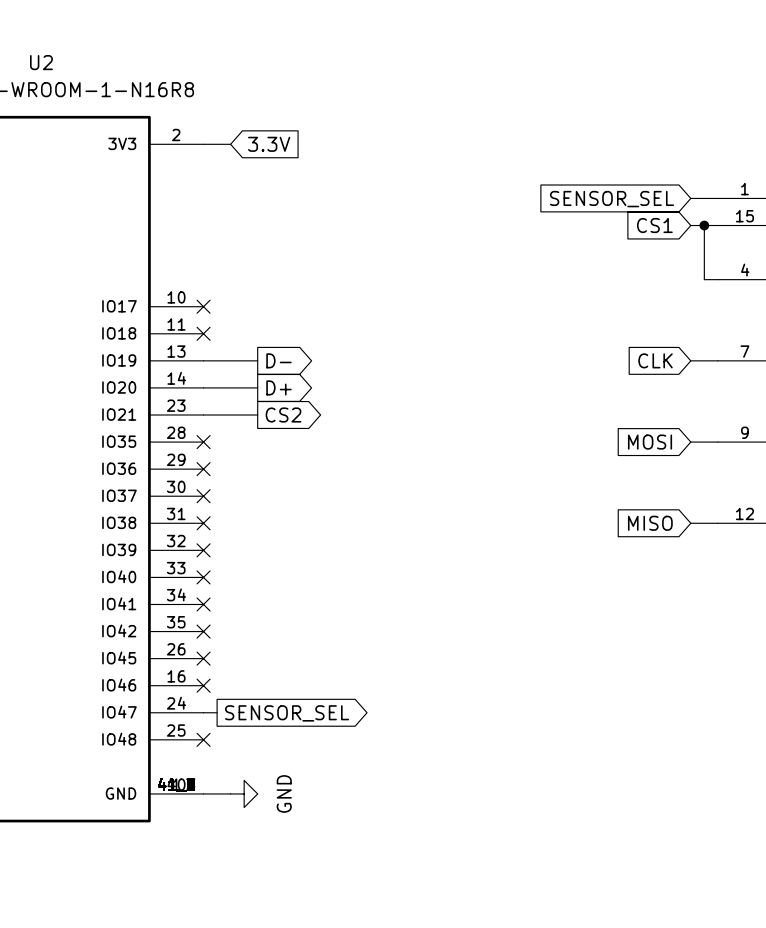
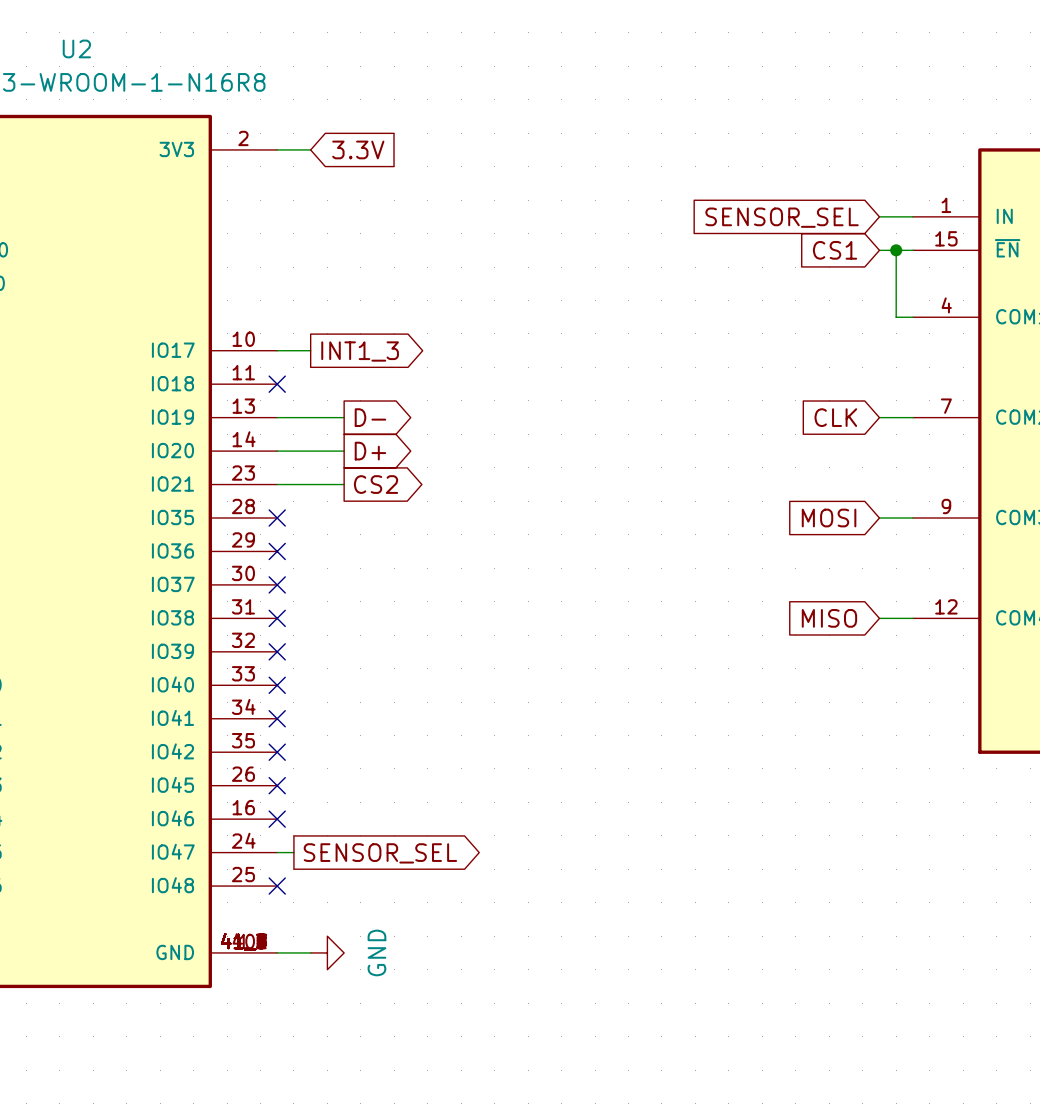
wire: none -> (277, 350) (310, 350)
no-connect mark: (203, 306) -> none
global label: none -> INT1_3 (360, 351)

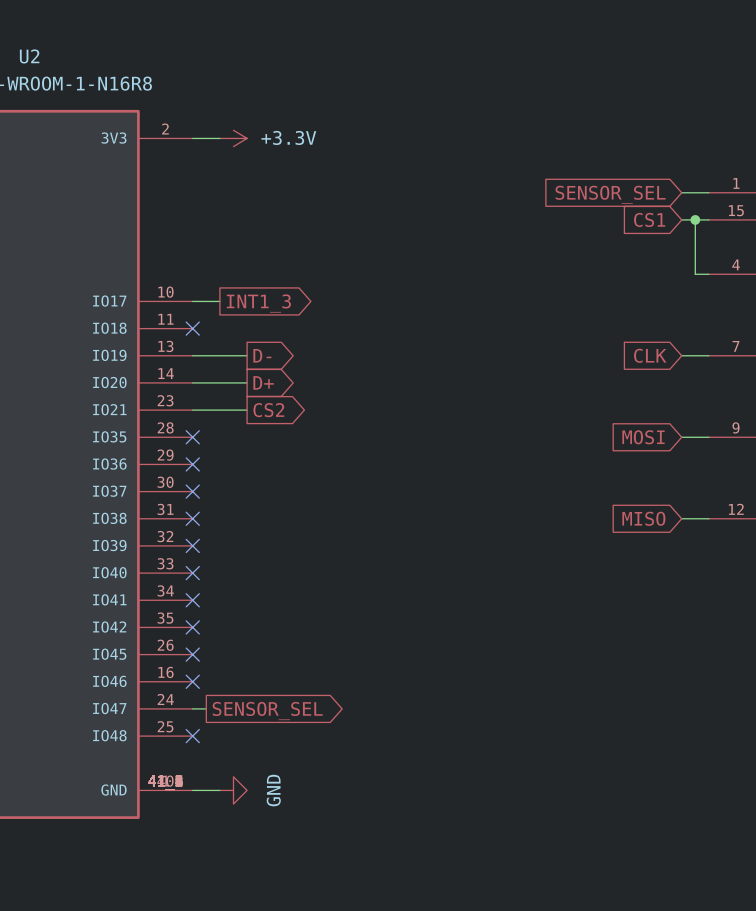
power symbol: none -> +3.3V (233, 138)
global label: 3.3V (358, 149) -> none

